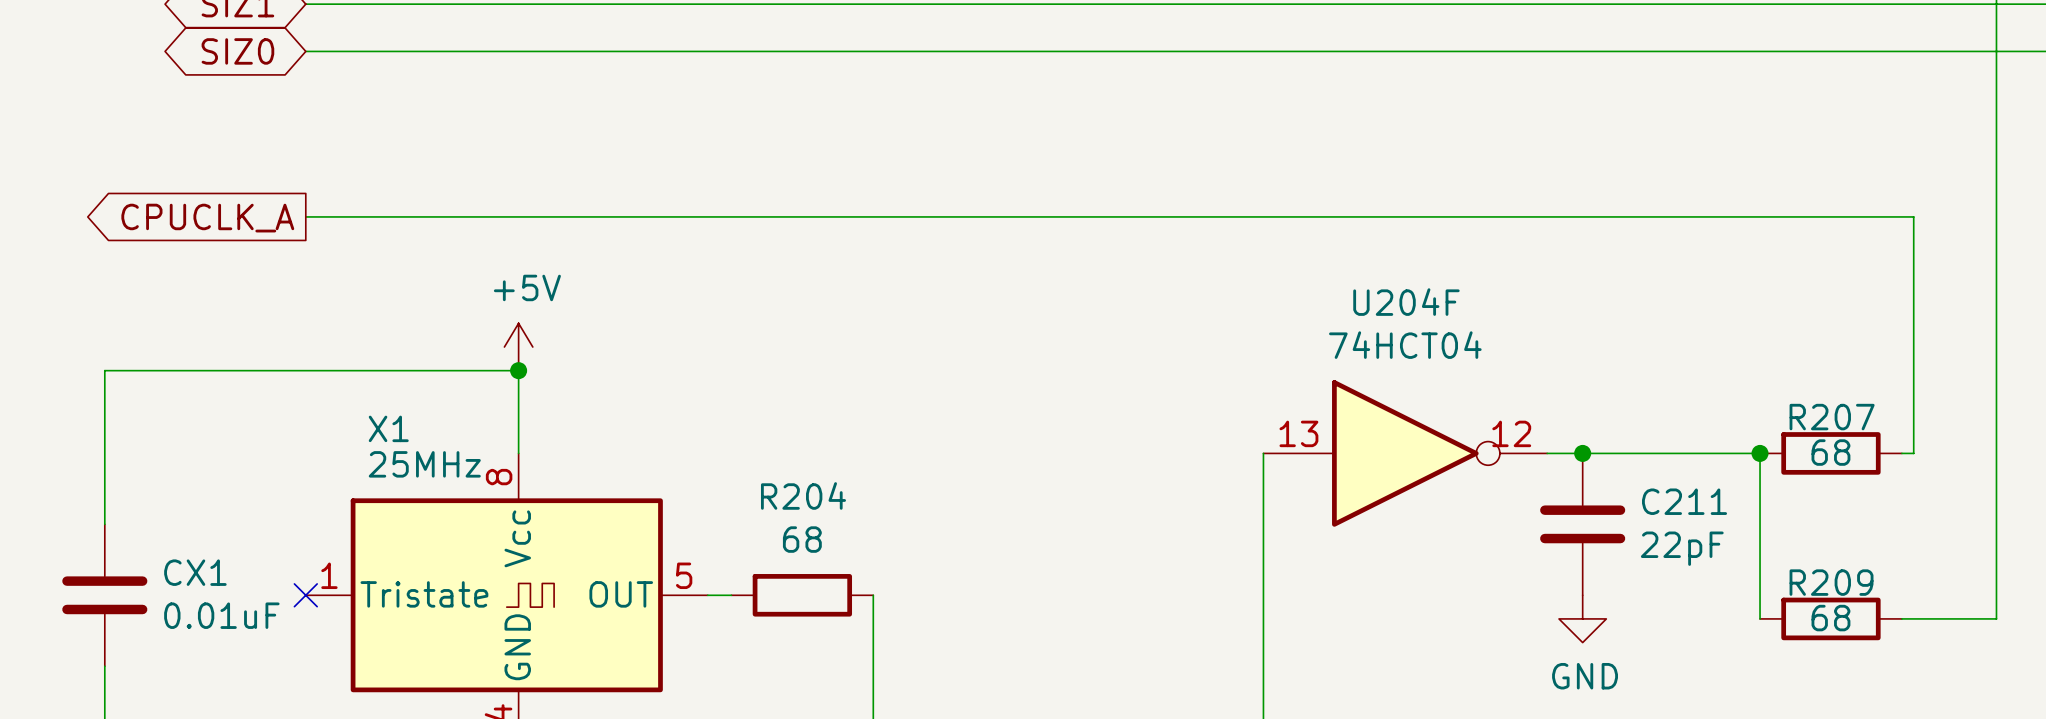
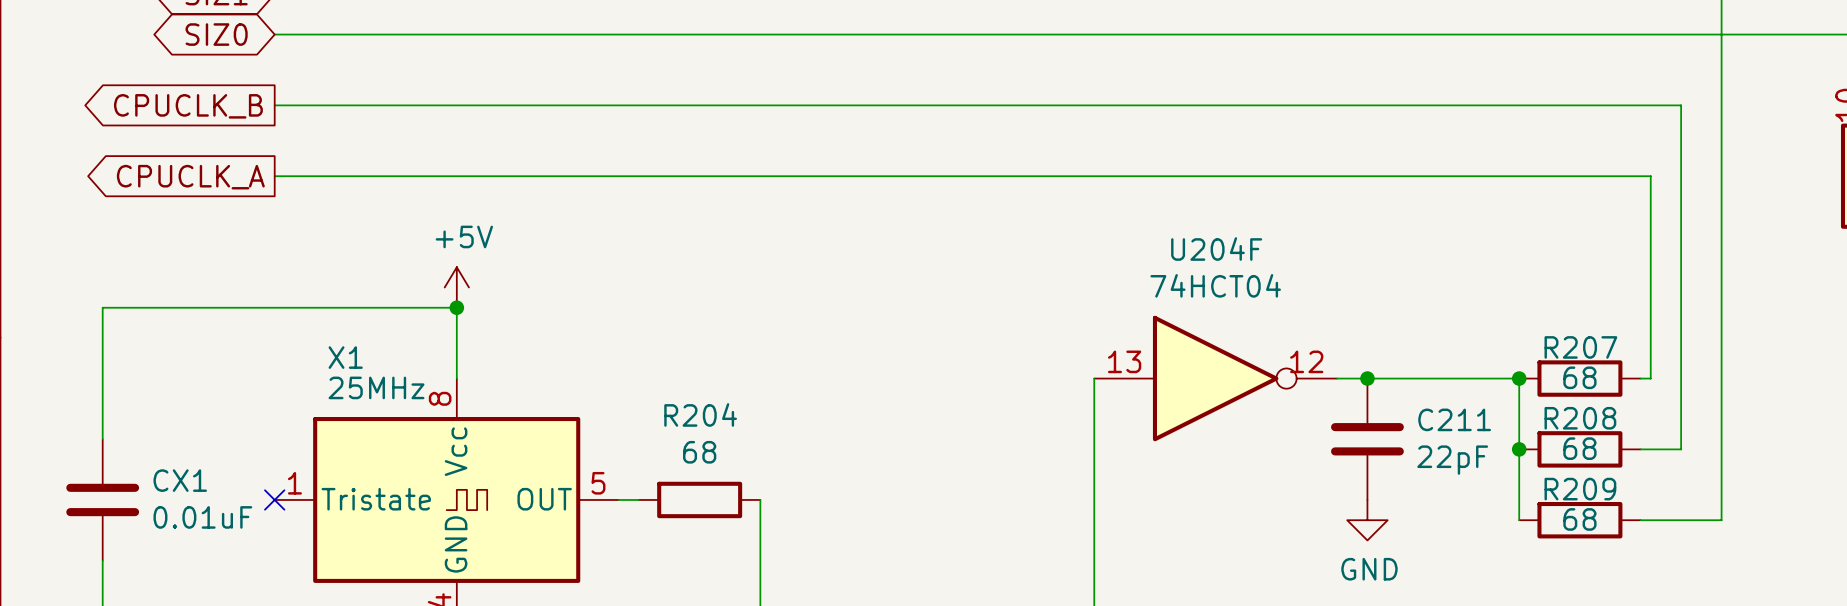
wire: none -> (274, 105) (1681, 105) (1681, 449) (1640, 449)
global label: none -> CPUCLK_B (188, 106)
junction: none -> (1519, 449)
R208: none -> 68 (1579, 449)

